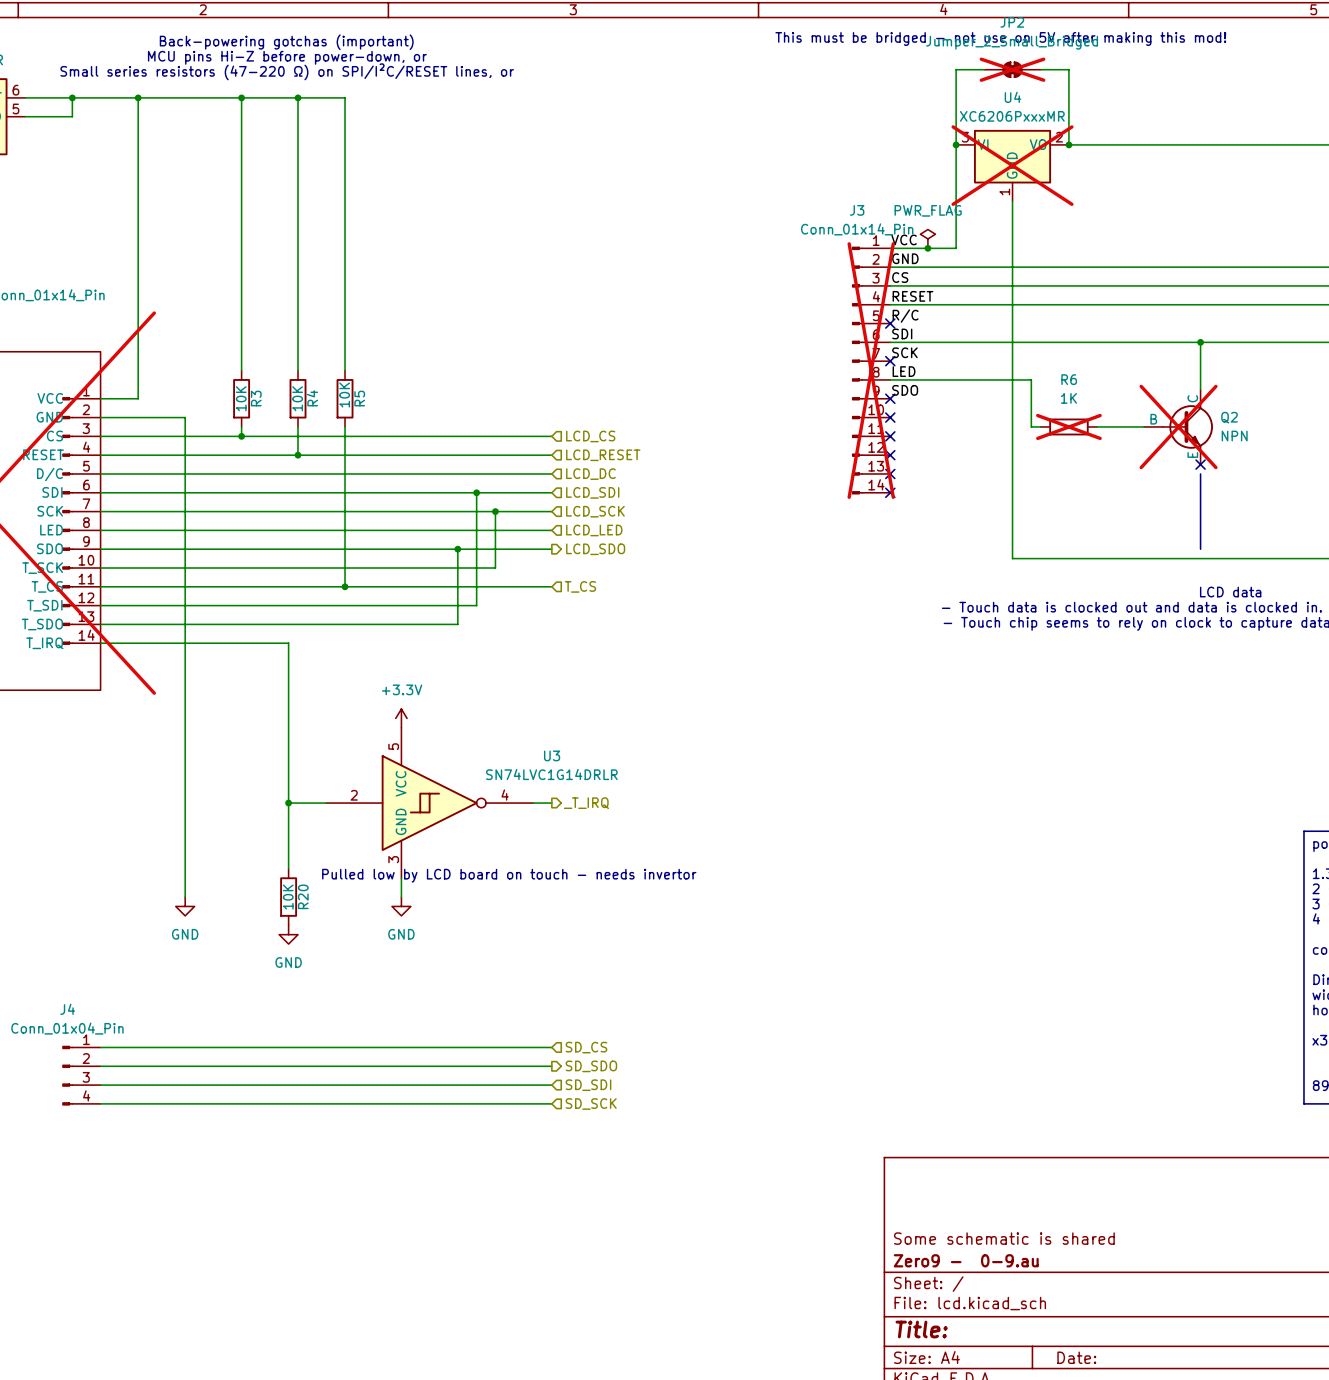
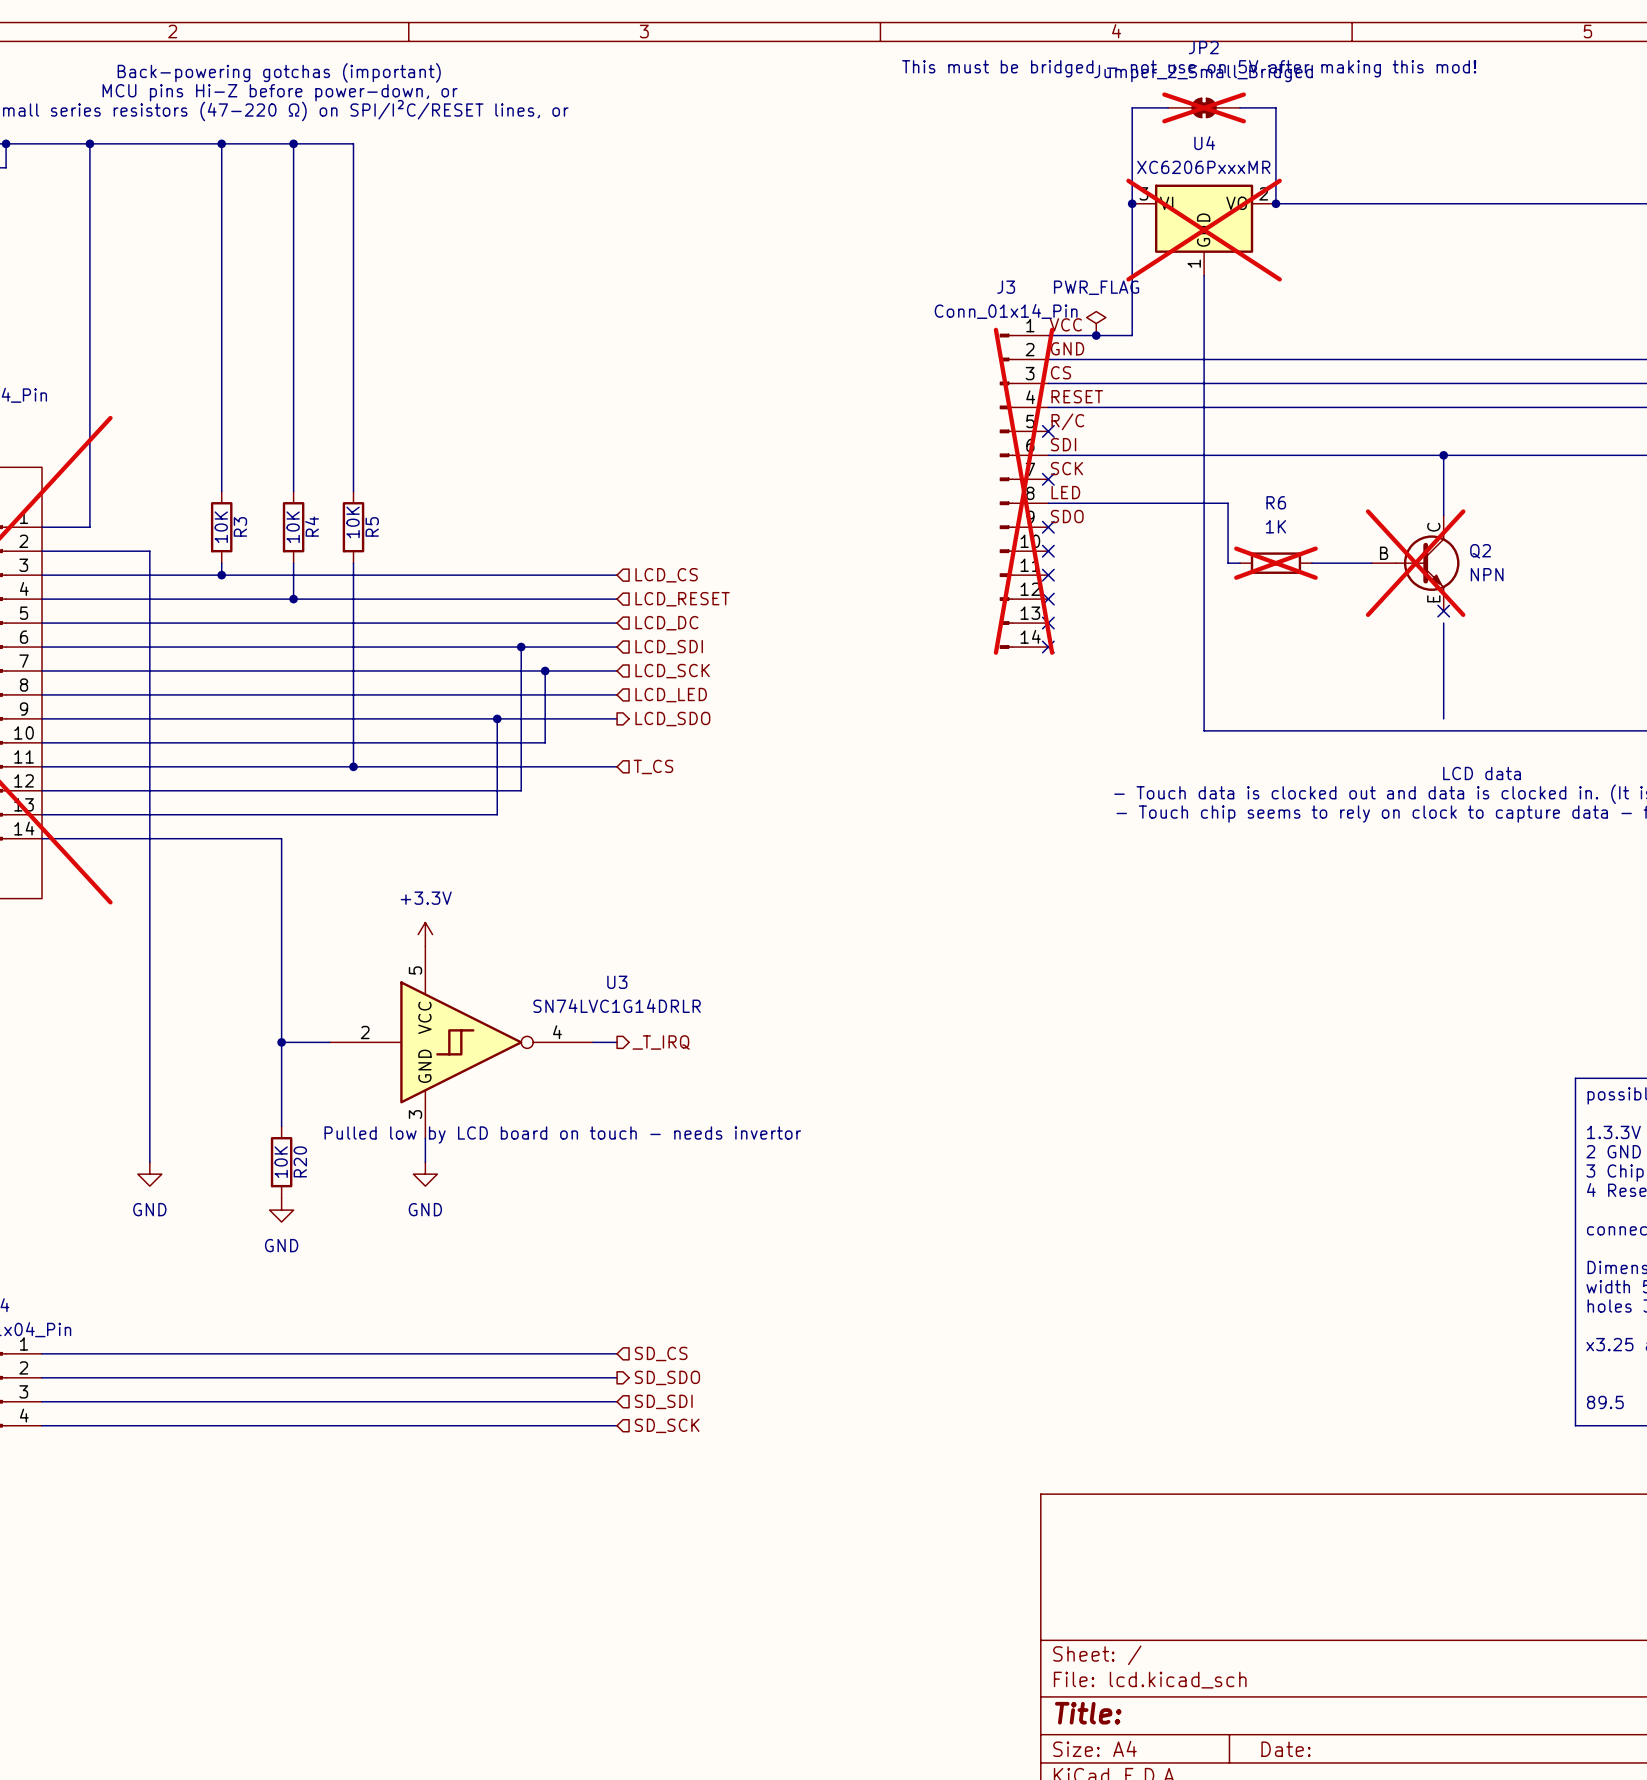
title block: Some schematic is shared (1004, 1238) -> none
title block: Zero9 - 0-9.au (966, 1260) -> none

